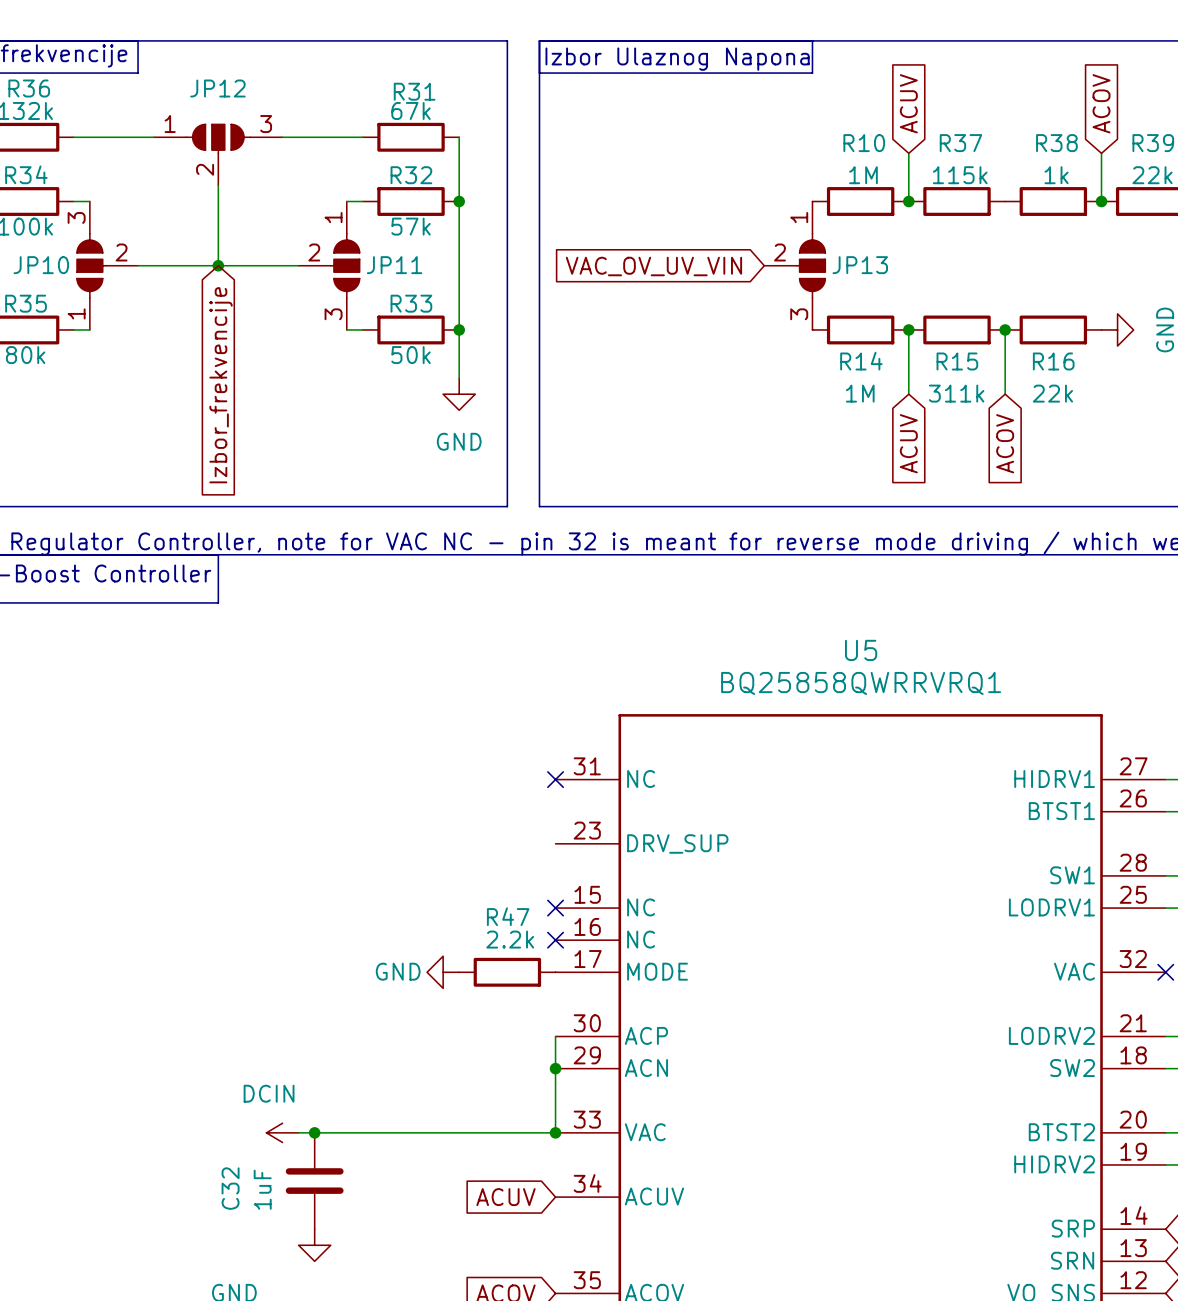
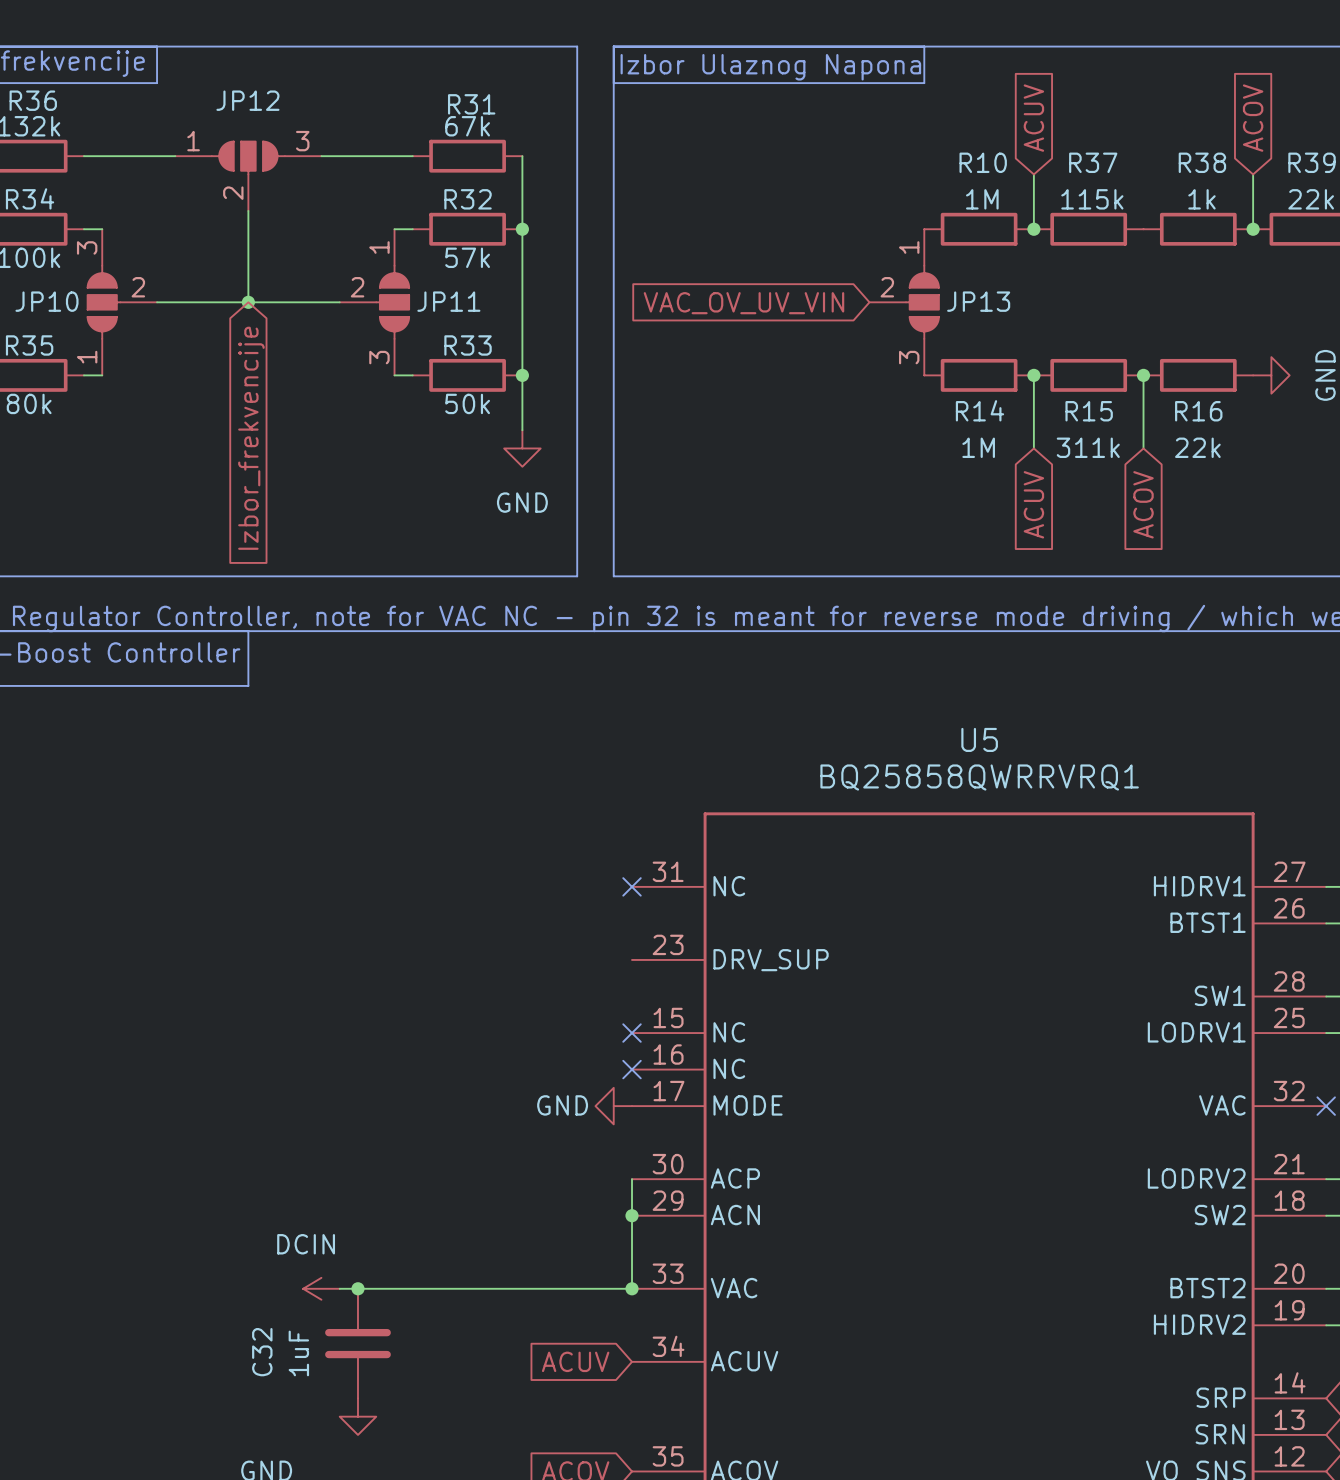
power symbol position: GND (443, 972) -> GND (613, 1106)
R47: 2.2k (507, 972) -> none

